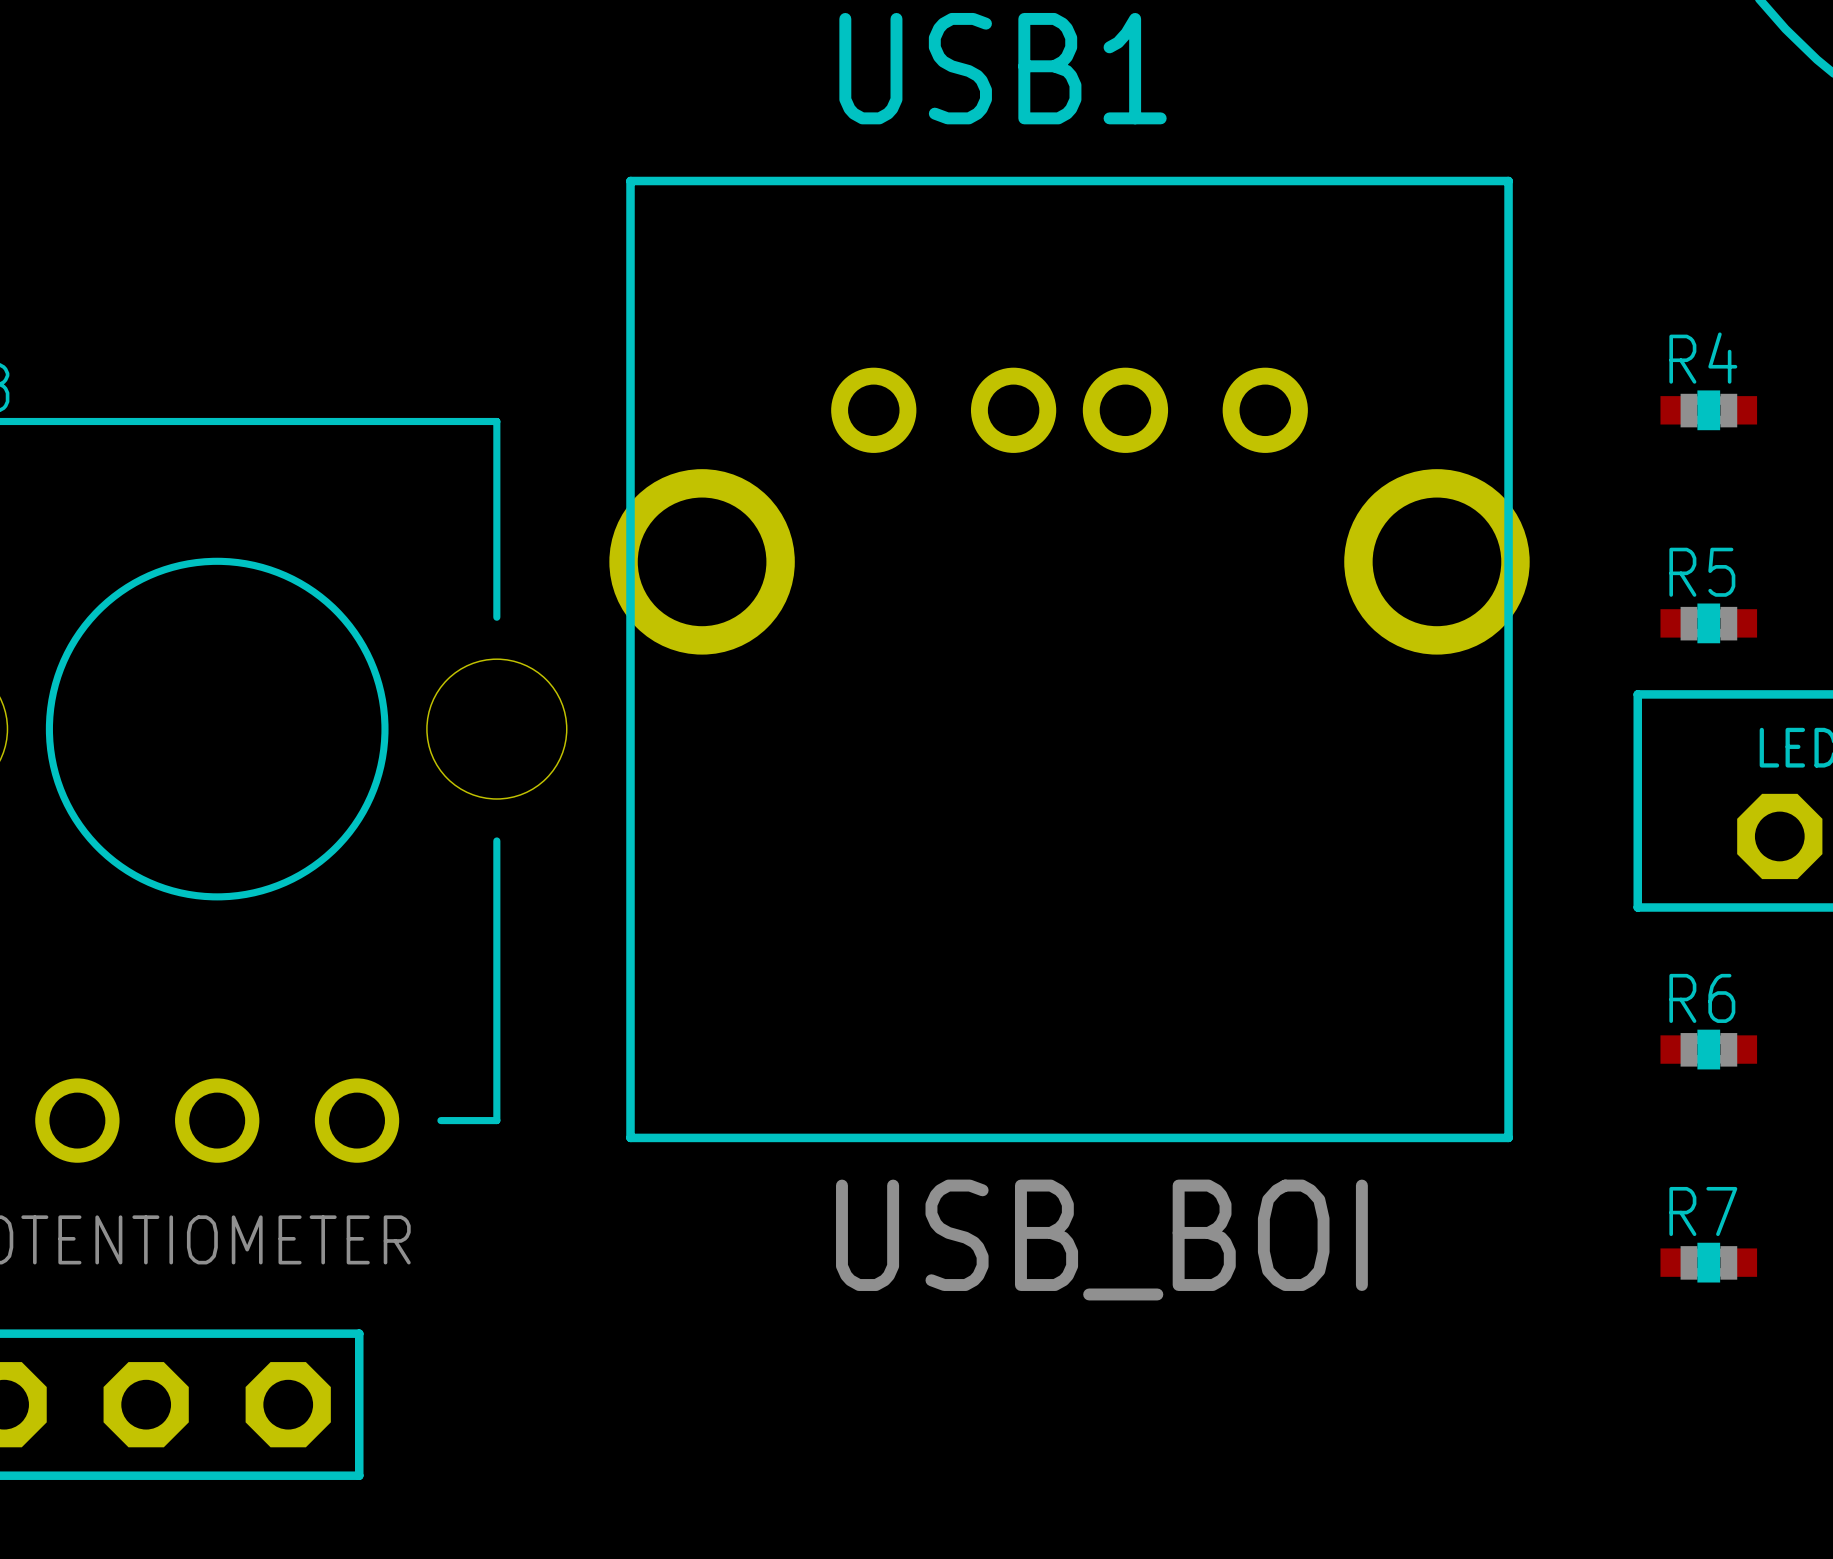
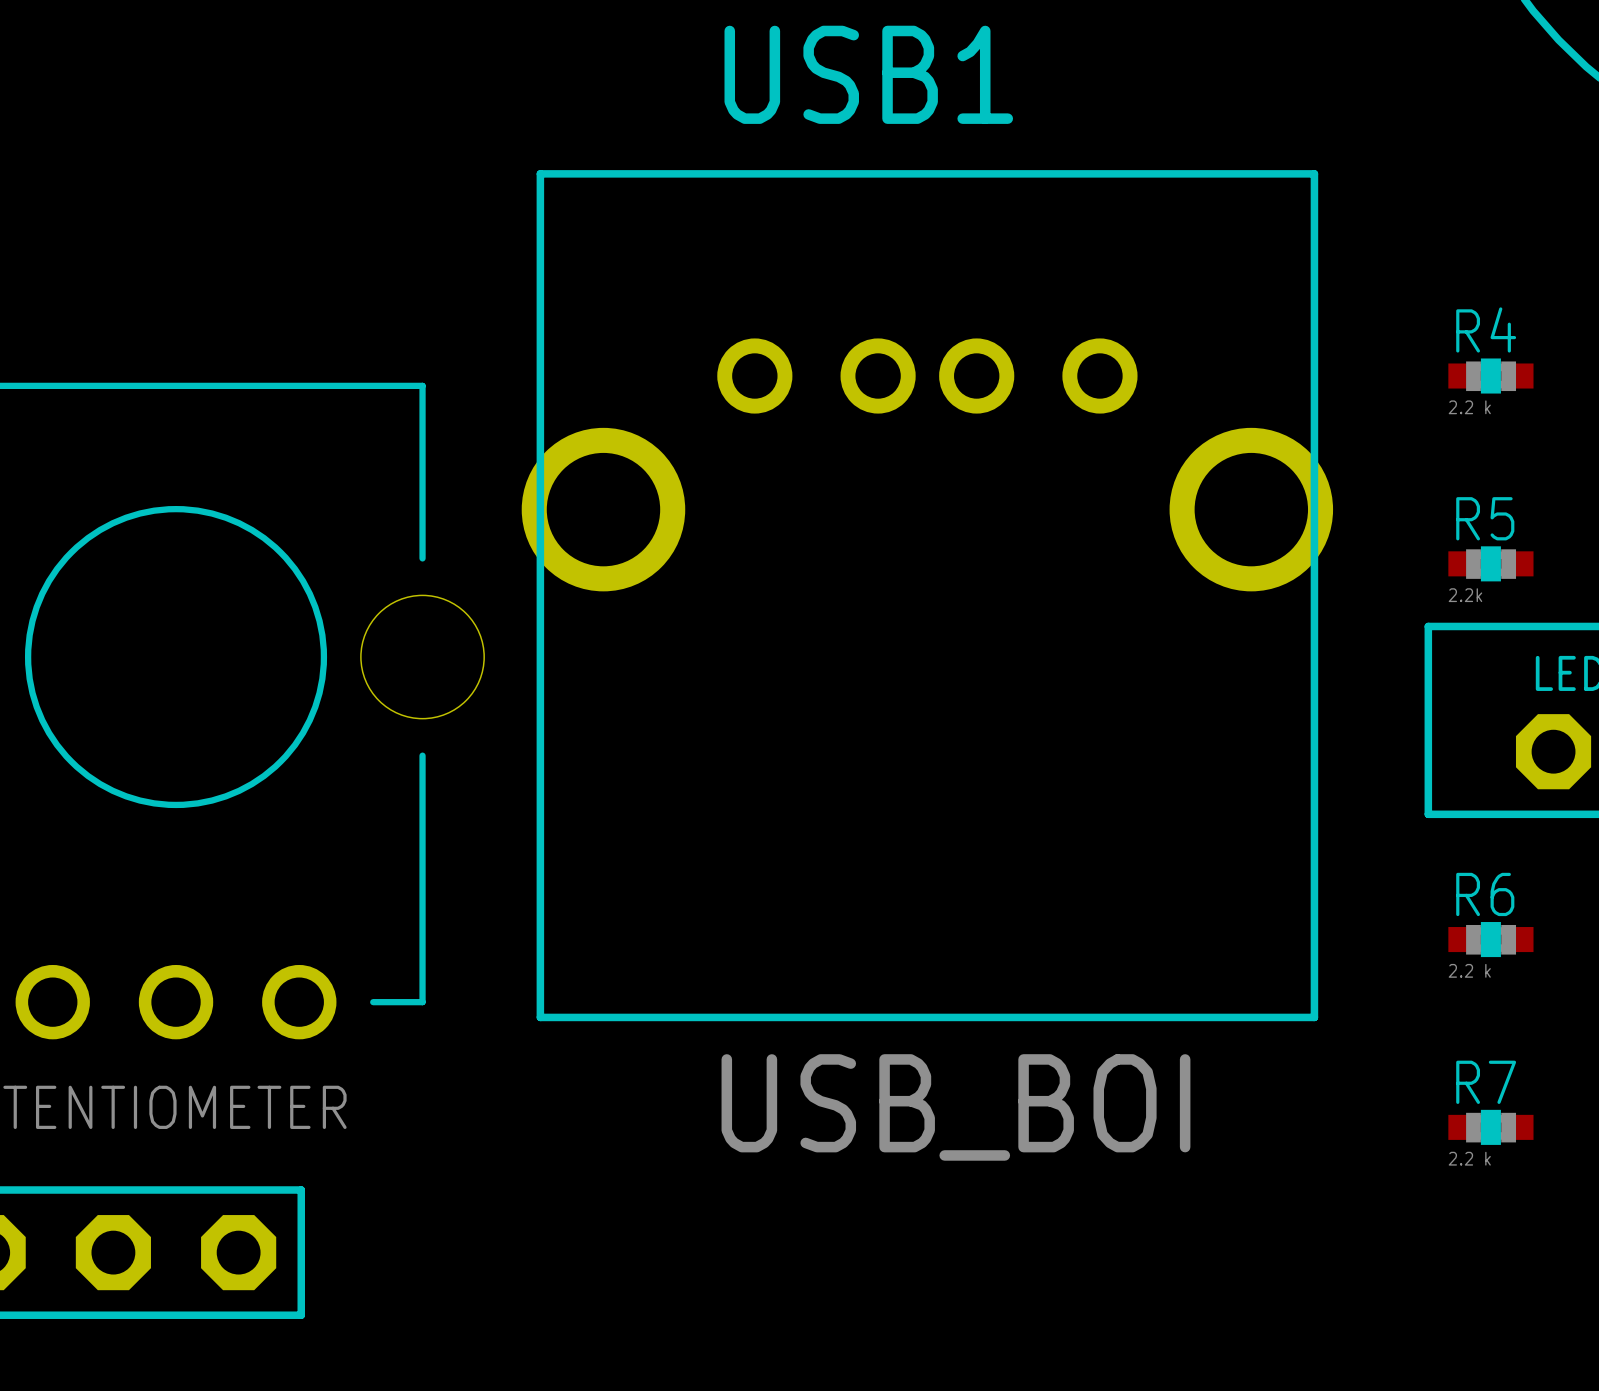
R4 value: none -> 2.2 k (1469, 407)
R5 value: none -> 2.2k (1465, 595)
R6 value: none -> 2.2 k (1469, 970)
R7 value: none -> 2.2 k (1469, 1158)

